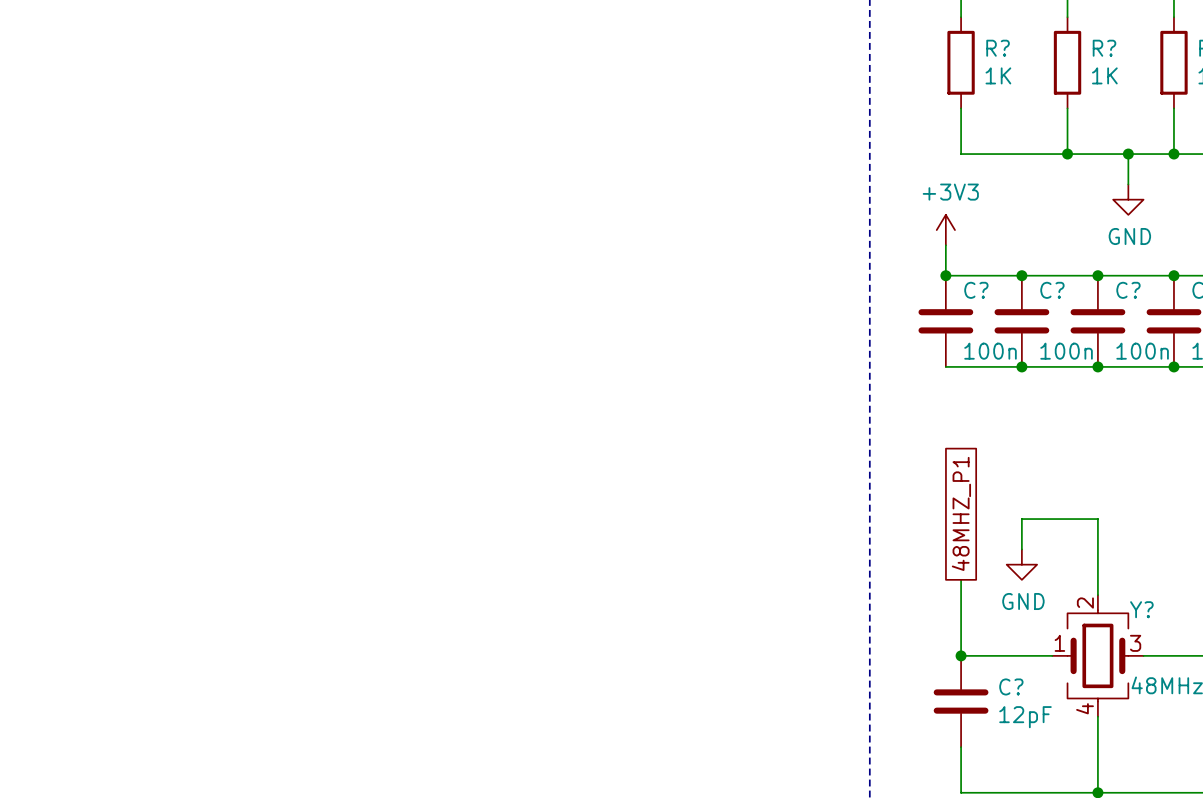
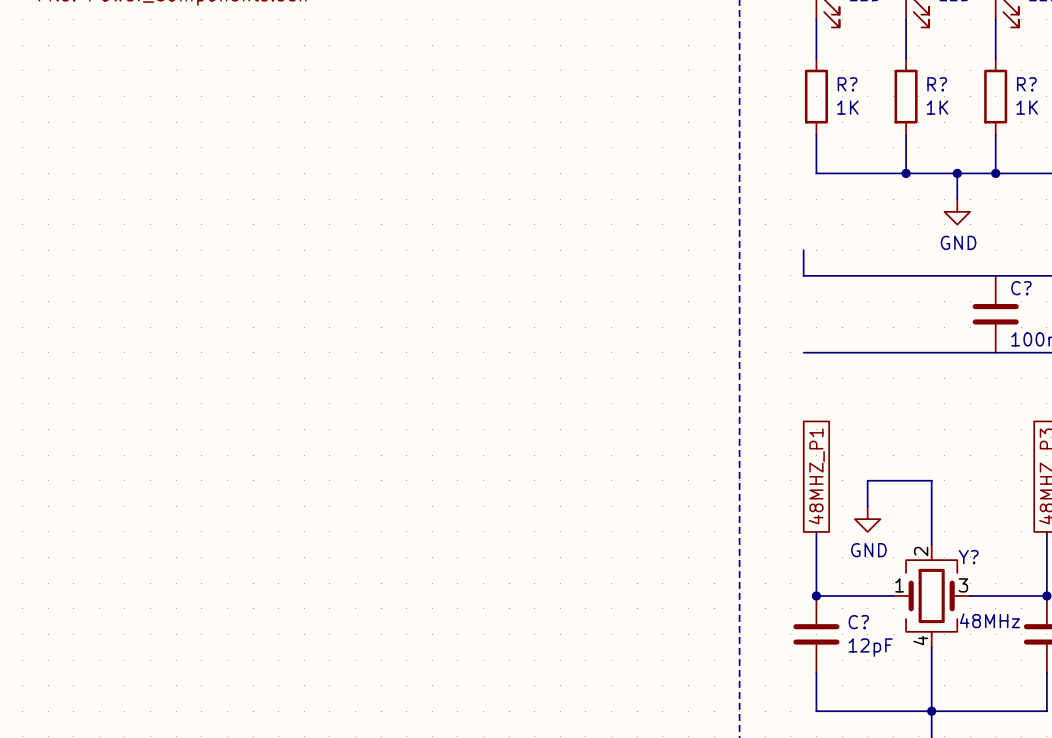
power symbol: +3V3 (945, 230) -> none
junction: (945, 275) -> none
junction: (1021, 275) -> none
junction: (1097, 275) -> none
junction: (1173, 275) -> none
C?: 100n (945, 321) -> none
C?: 100n (1021, 321) -> none
C?: 100n (1097, 321) -> none
junction: (1021, 366) -> none
junction: (1097, 366) -> none
junction: (1173, 366) -> none

